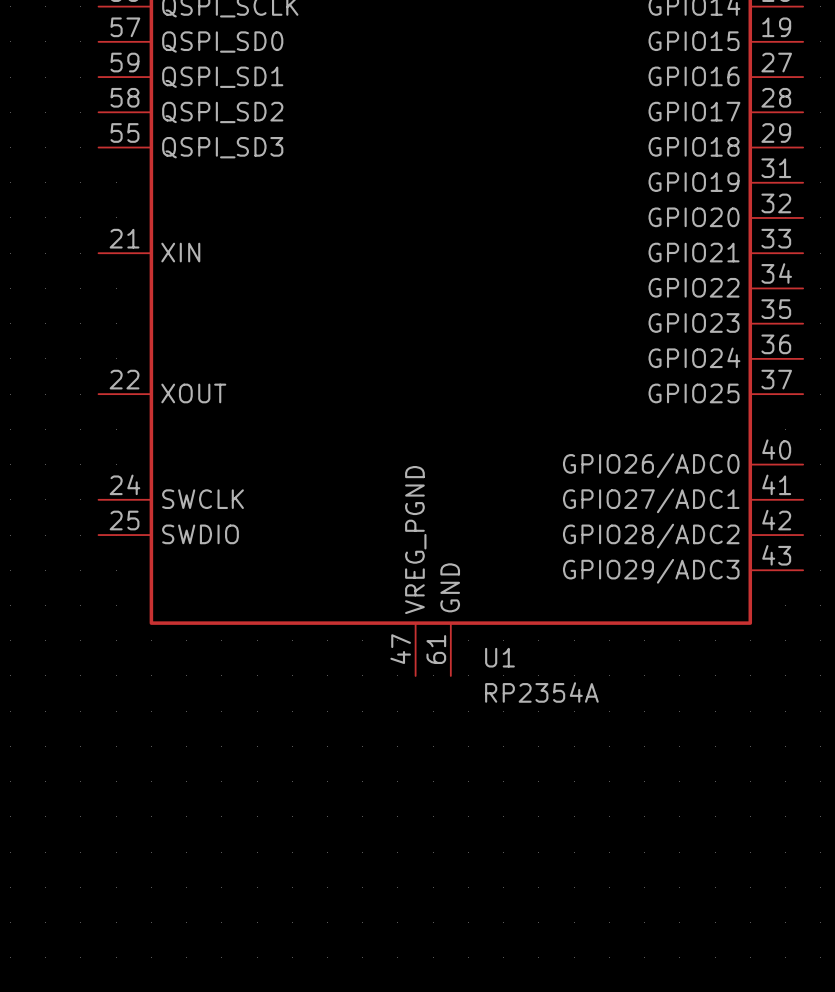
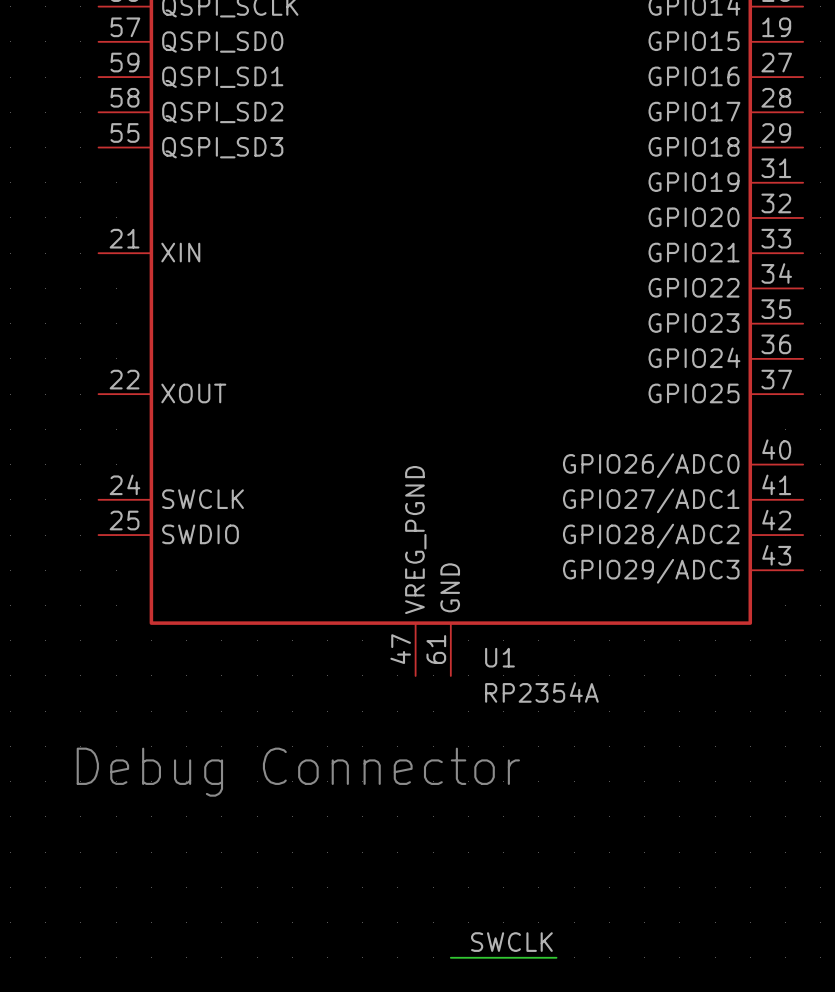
text: none -> Debug Connector (298, 772)
label: none -> SWCLK (511, 942)
wire: none -> (450, 957) (556, 957)

